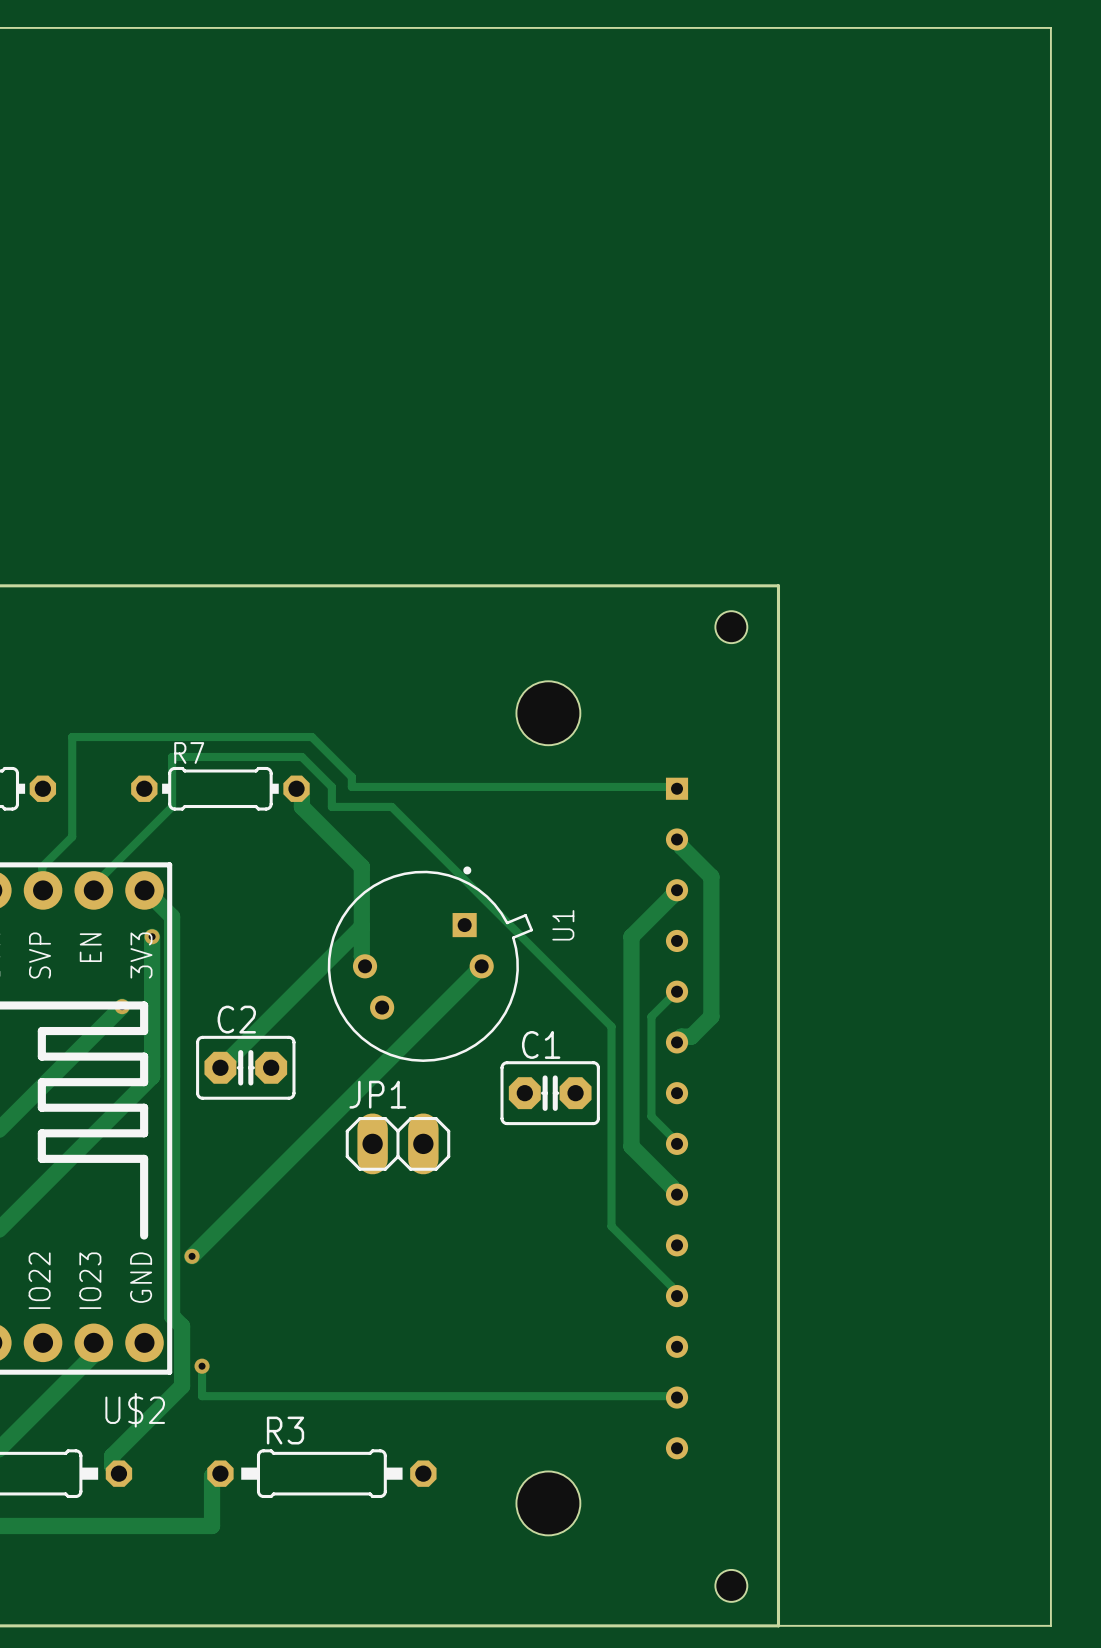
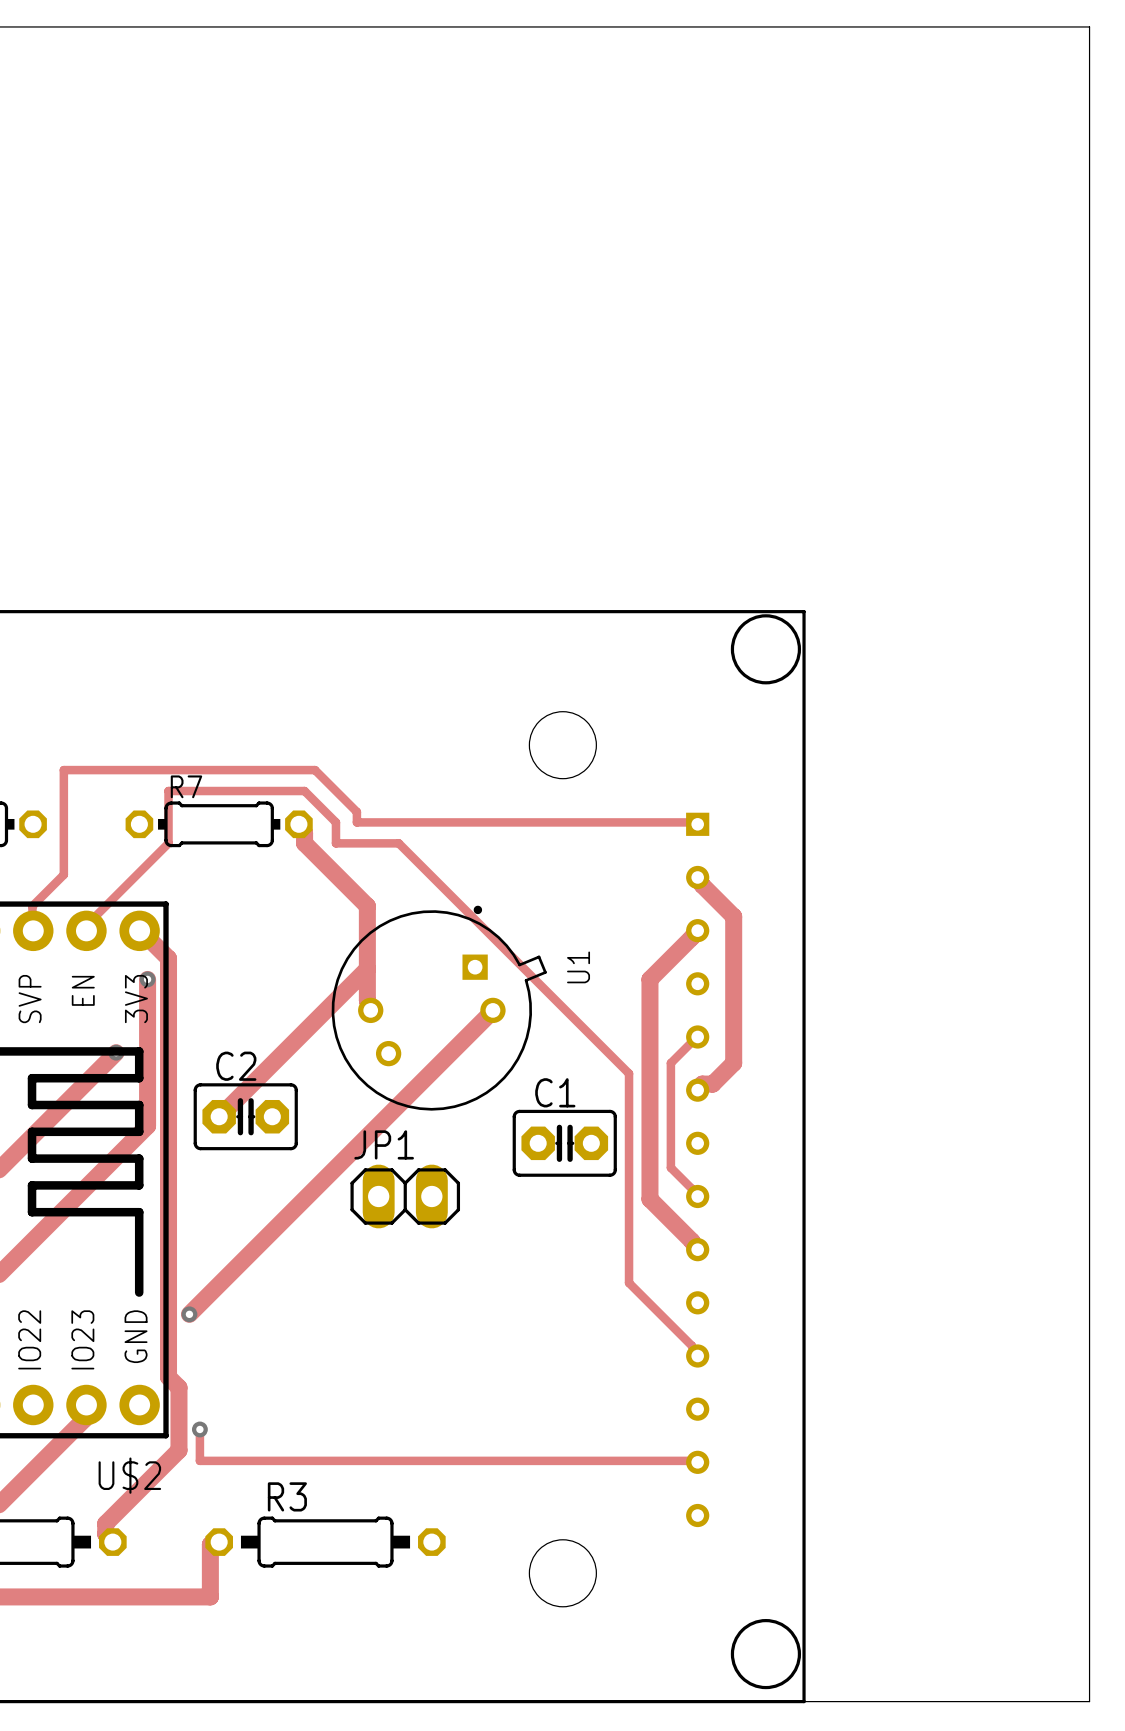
round board edge: none -> [730, 614, 802, 685]
hole: (731, 627) -> none
round board edge: none -> [730, 1618, 802, 1690]
hole: (731, 1585) -> none

